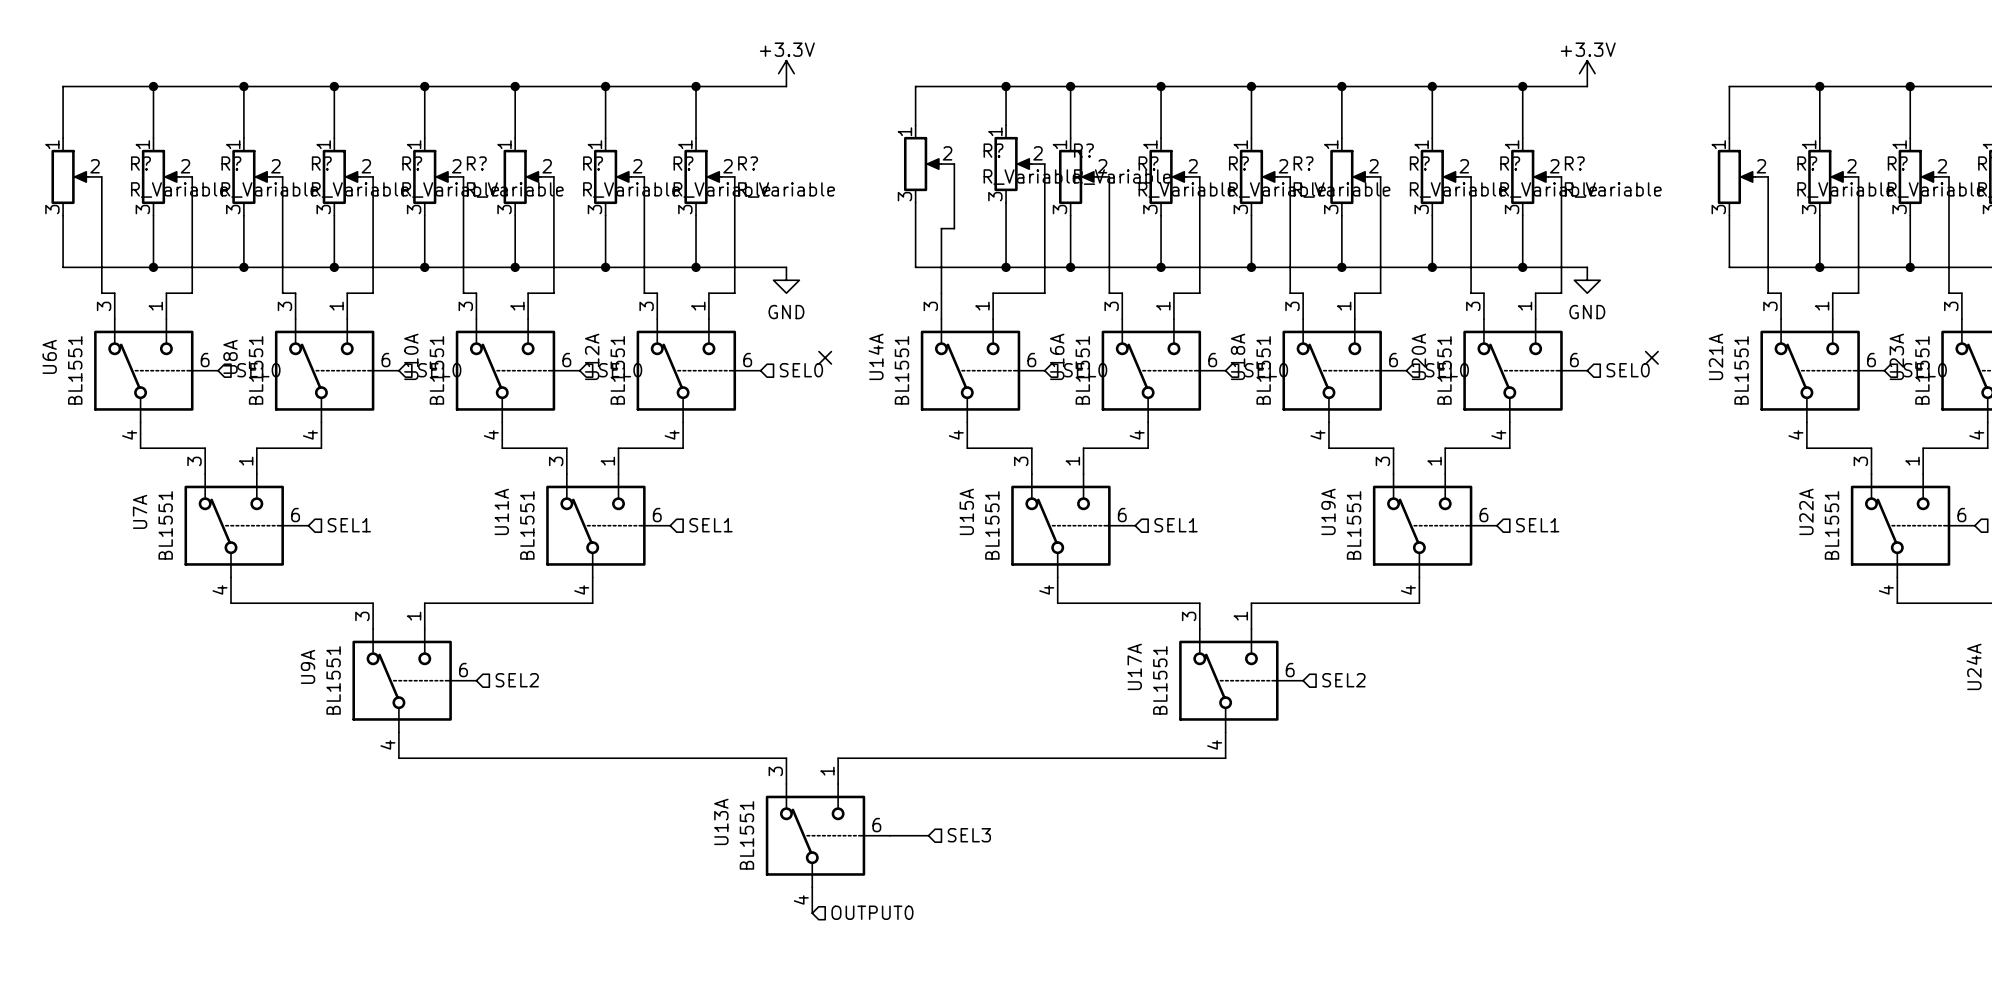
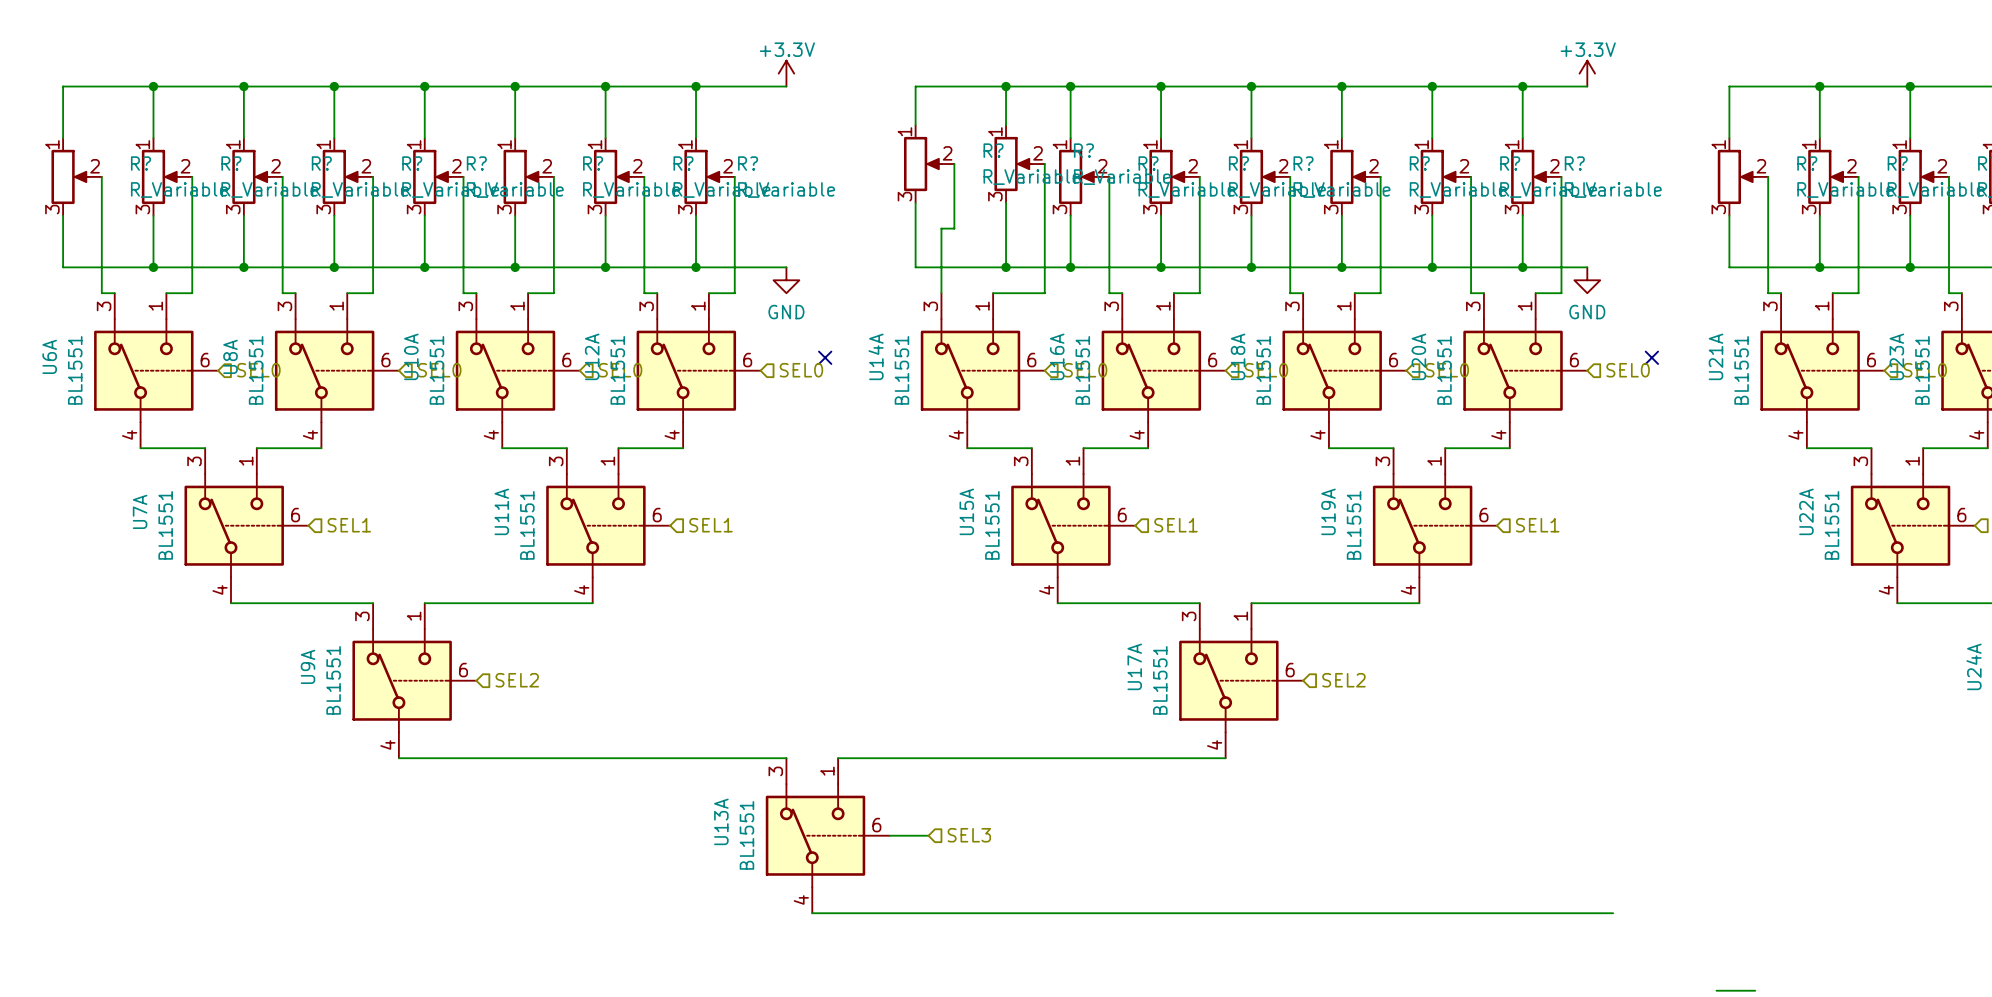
hierarchical label: OUTPUT0 (872, 912) -> none
wire: none -> (812, 913) (1613, 913)
wire: none -> (1716, 990) (1755, 990)

